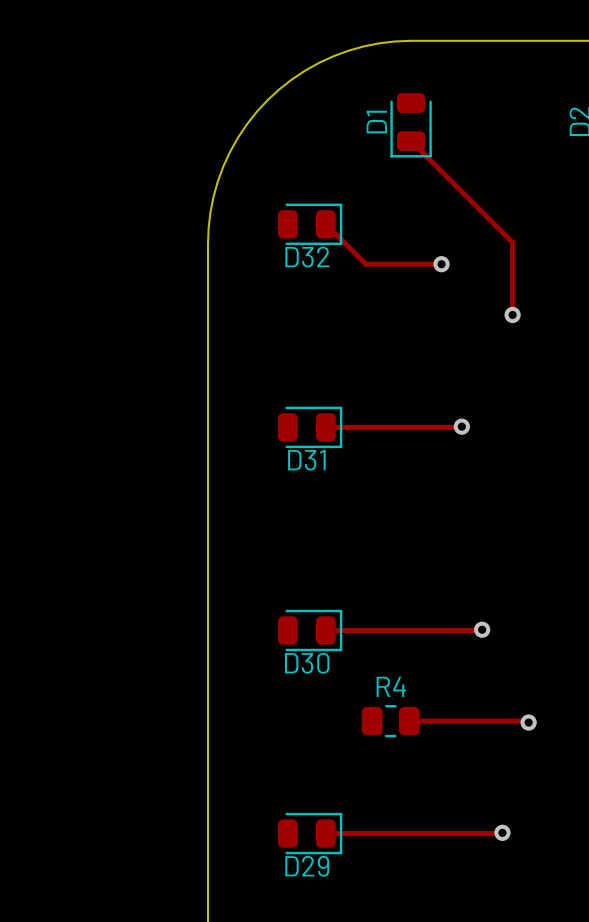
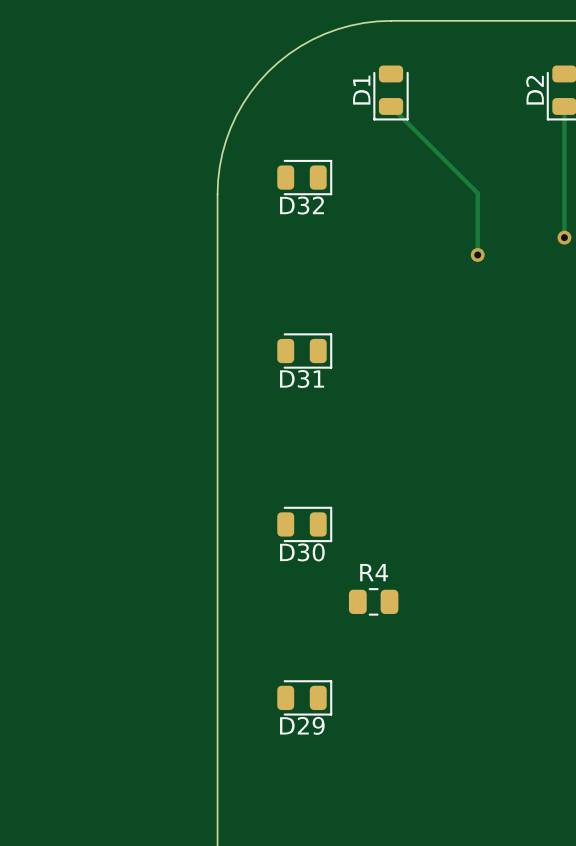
track: (325, 224) (365, 264) (441, 264) -> none
via: (441, 264) -> none
track: (461, 426) (325, 427) -> none
via: (461, 426) -> none
track: (482, 629) (325, 630) -> none
via: (482, 629) -> none
track: (409, 721) (528, 722) -> none
via: (528, 722) -> none
track: (502, 832) (325, 833) -> none
via: (502, 832) -> none

